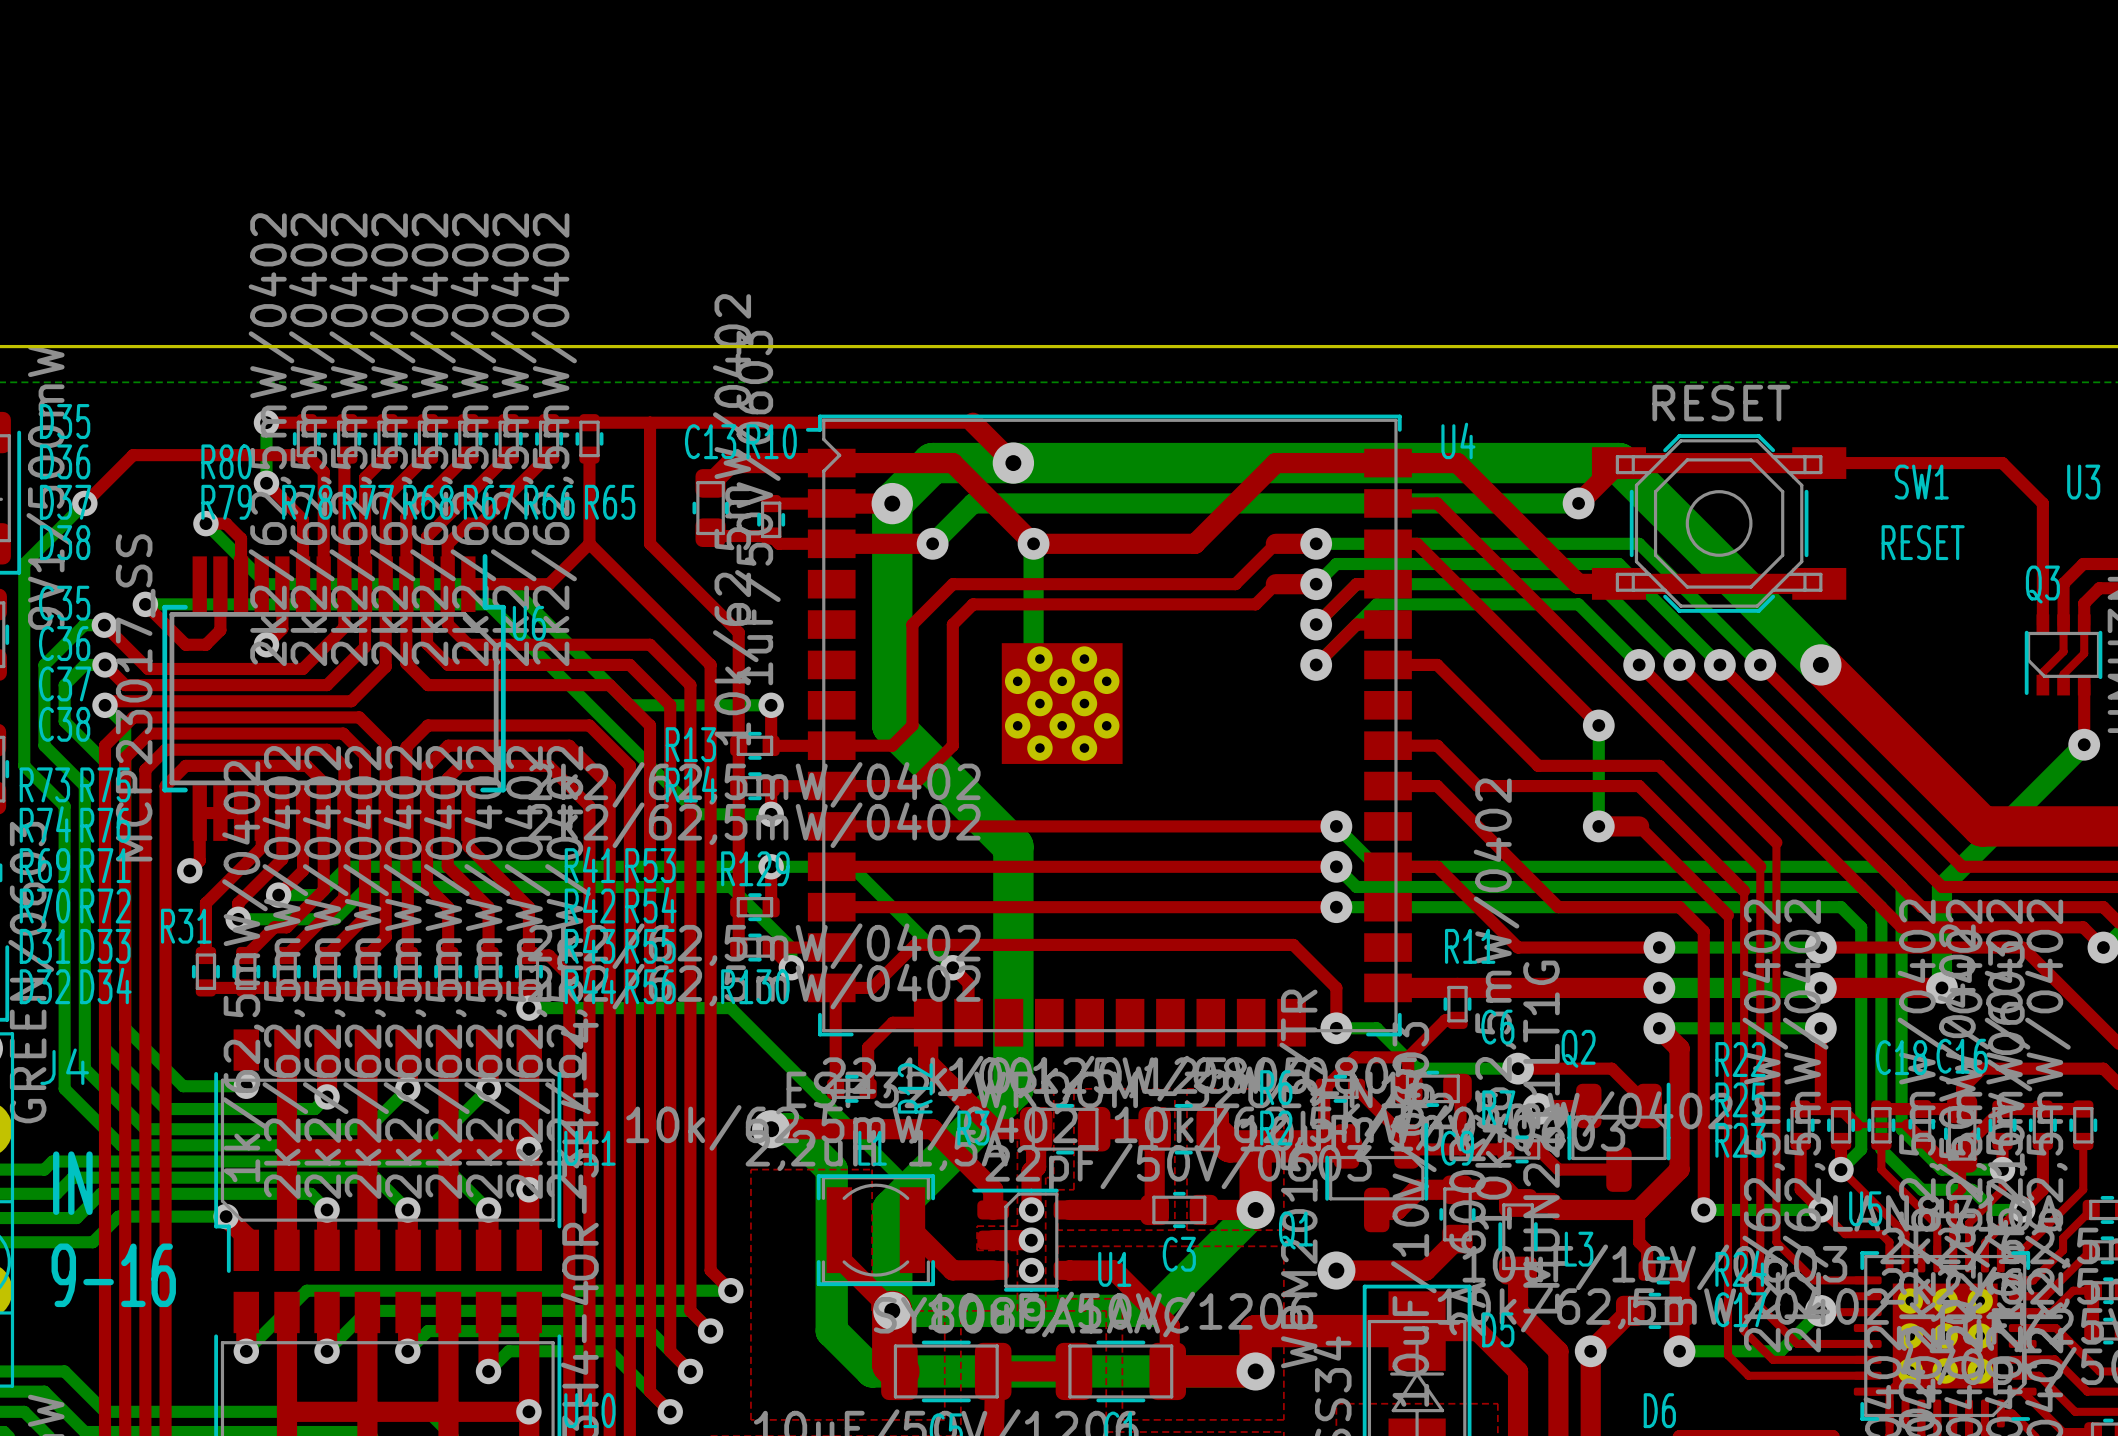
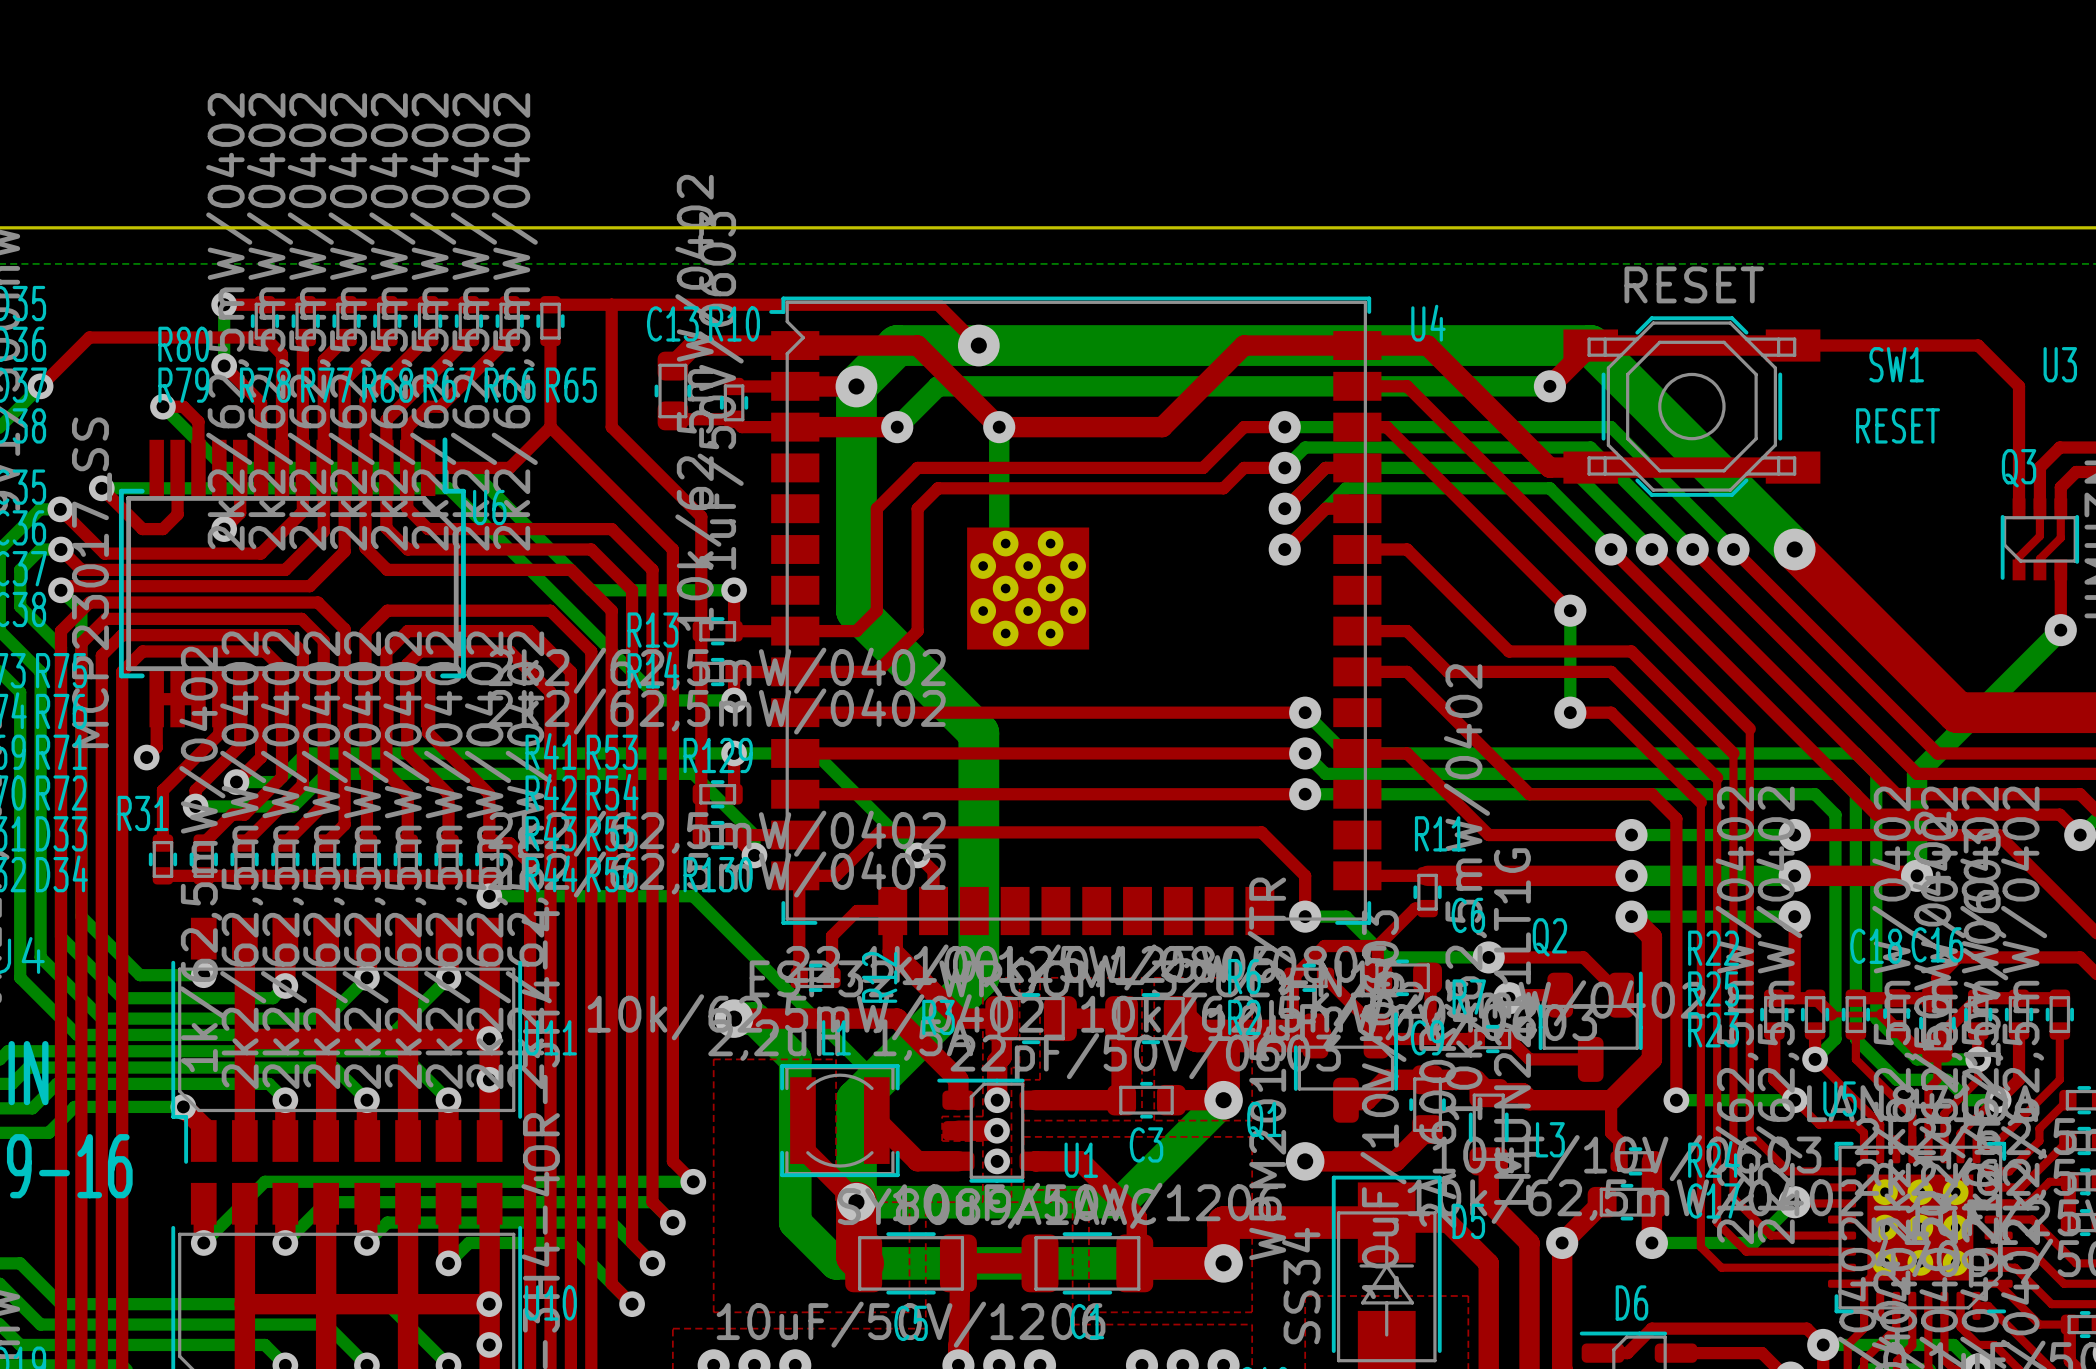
top track width: thick (973, 422) (1013, 463) -> thin (938, 304) (978, 345)
top track width: thick (1275, 543) (1316, 543) -> thin (1243, 427) (1284, 427)
top track width: thick (1275, 584) (1316, 584) -> thin (1243, 467) (1284, 467)
top track width: thick (1598, 826) (1639, 826) -> thin (1570, 712) (1611, 712)
top track width: thick (1388, 987) (1457, 987) -> thin (1357, 875) (1427, 875)

